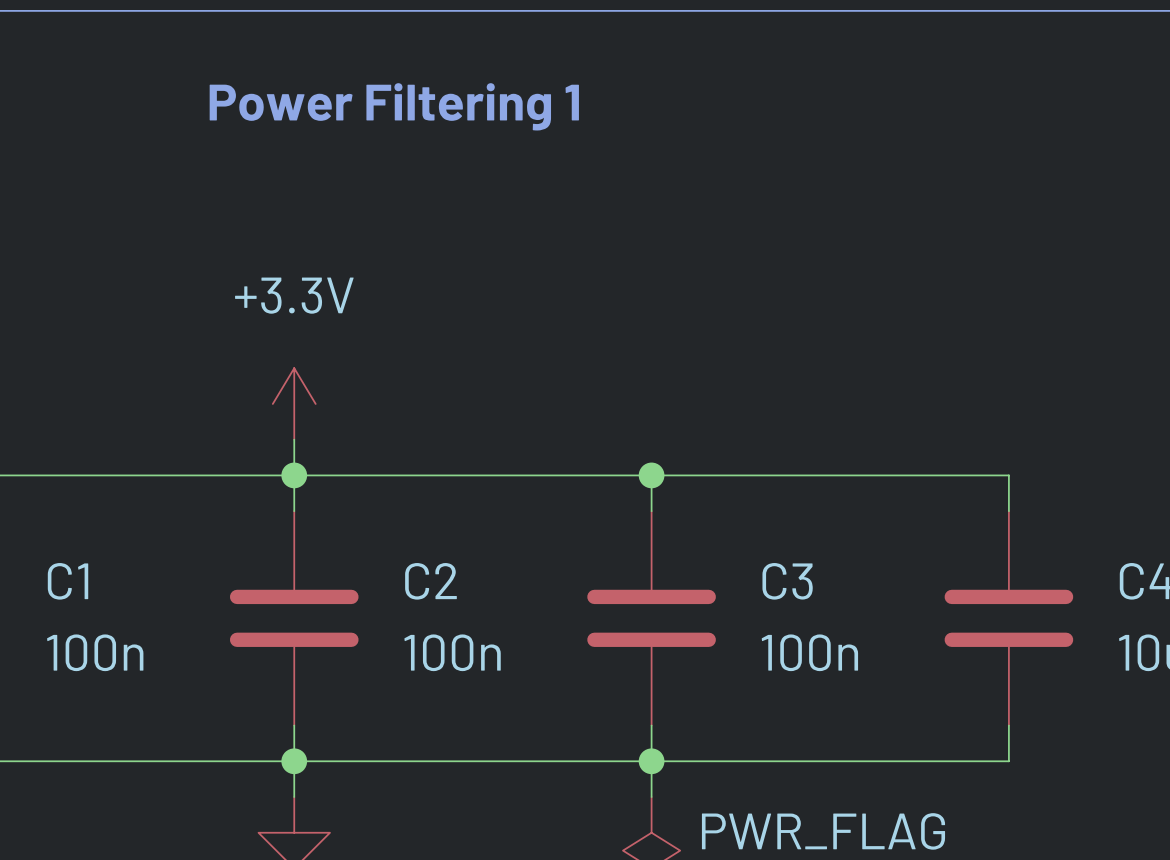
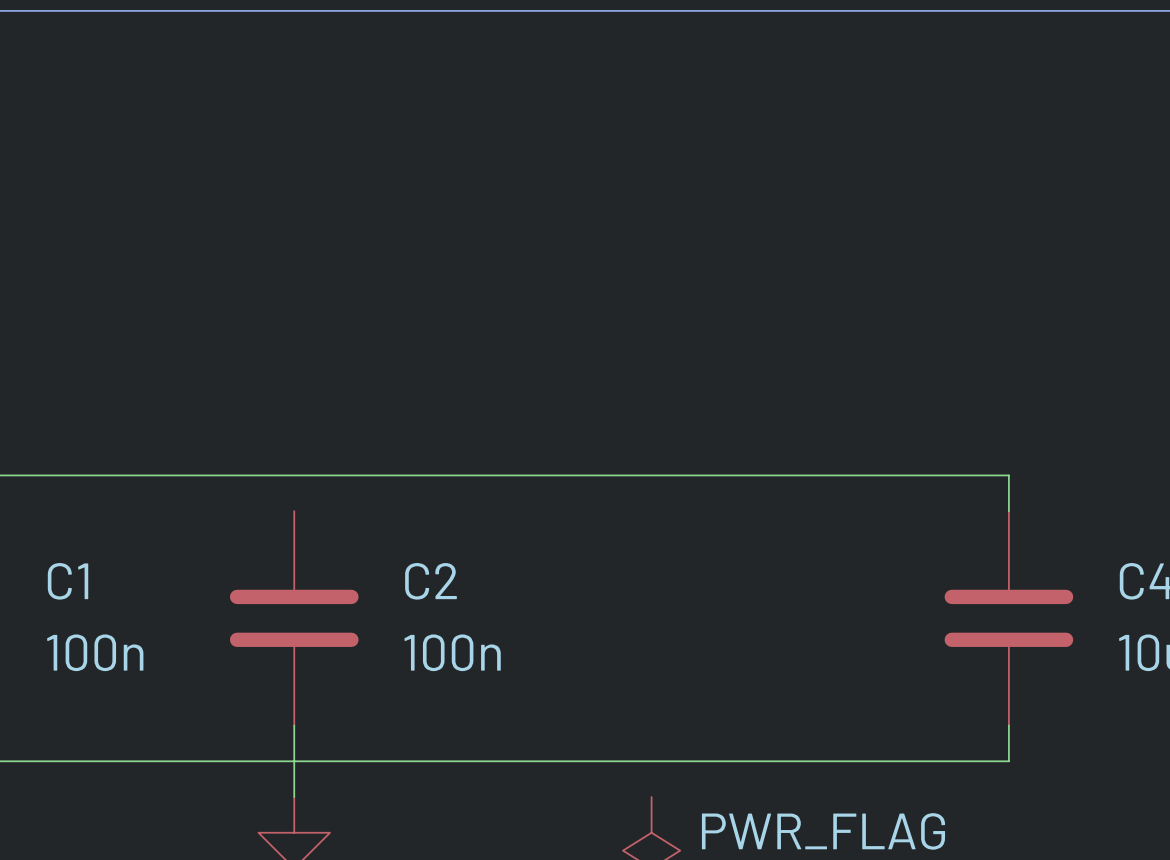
text: Power Filtering 1 (394, 106) -> none
power symbol: +3.3V (294, 403) -> none
wire: (294, 439) (294, 511) -> none
junction: (294, 475) -> none
wire: (651, 475) (651, 511) -> none
junction: (651, 475) -> none
C3: 100n (651, 618) -> none
wire: (651, 725) (651, 797) -> none
junction: (294, 761) -> none
junction: (651, 761) -> none

